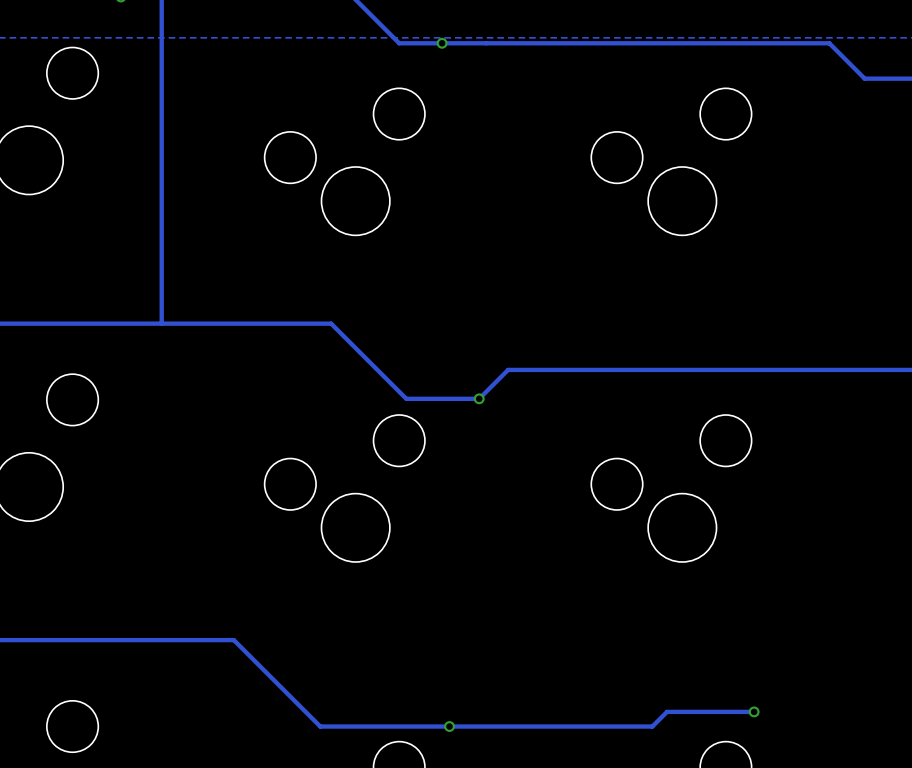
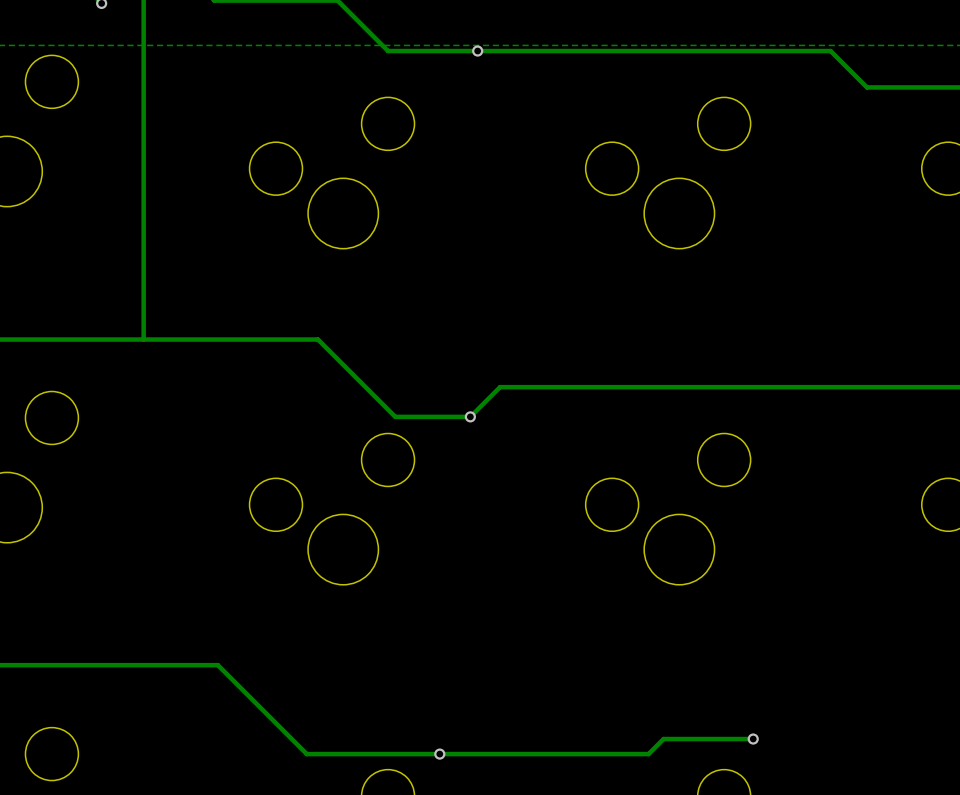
via position: (442, 43) -> (477, 51)

